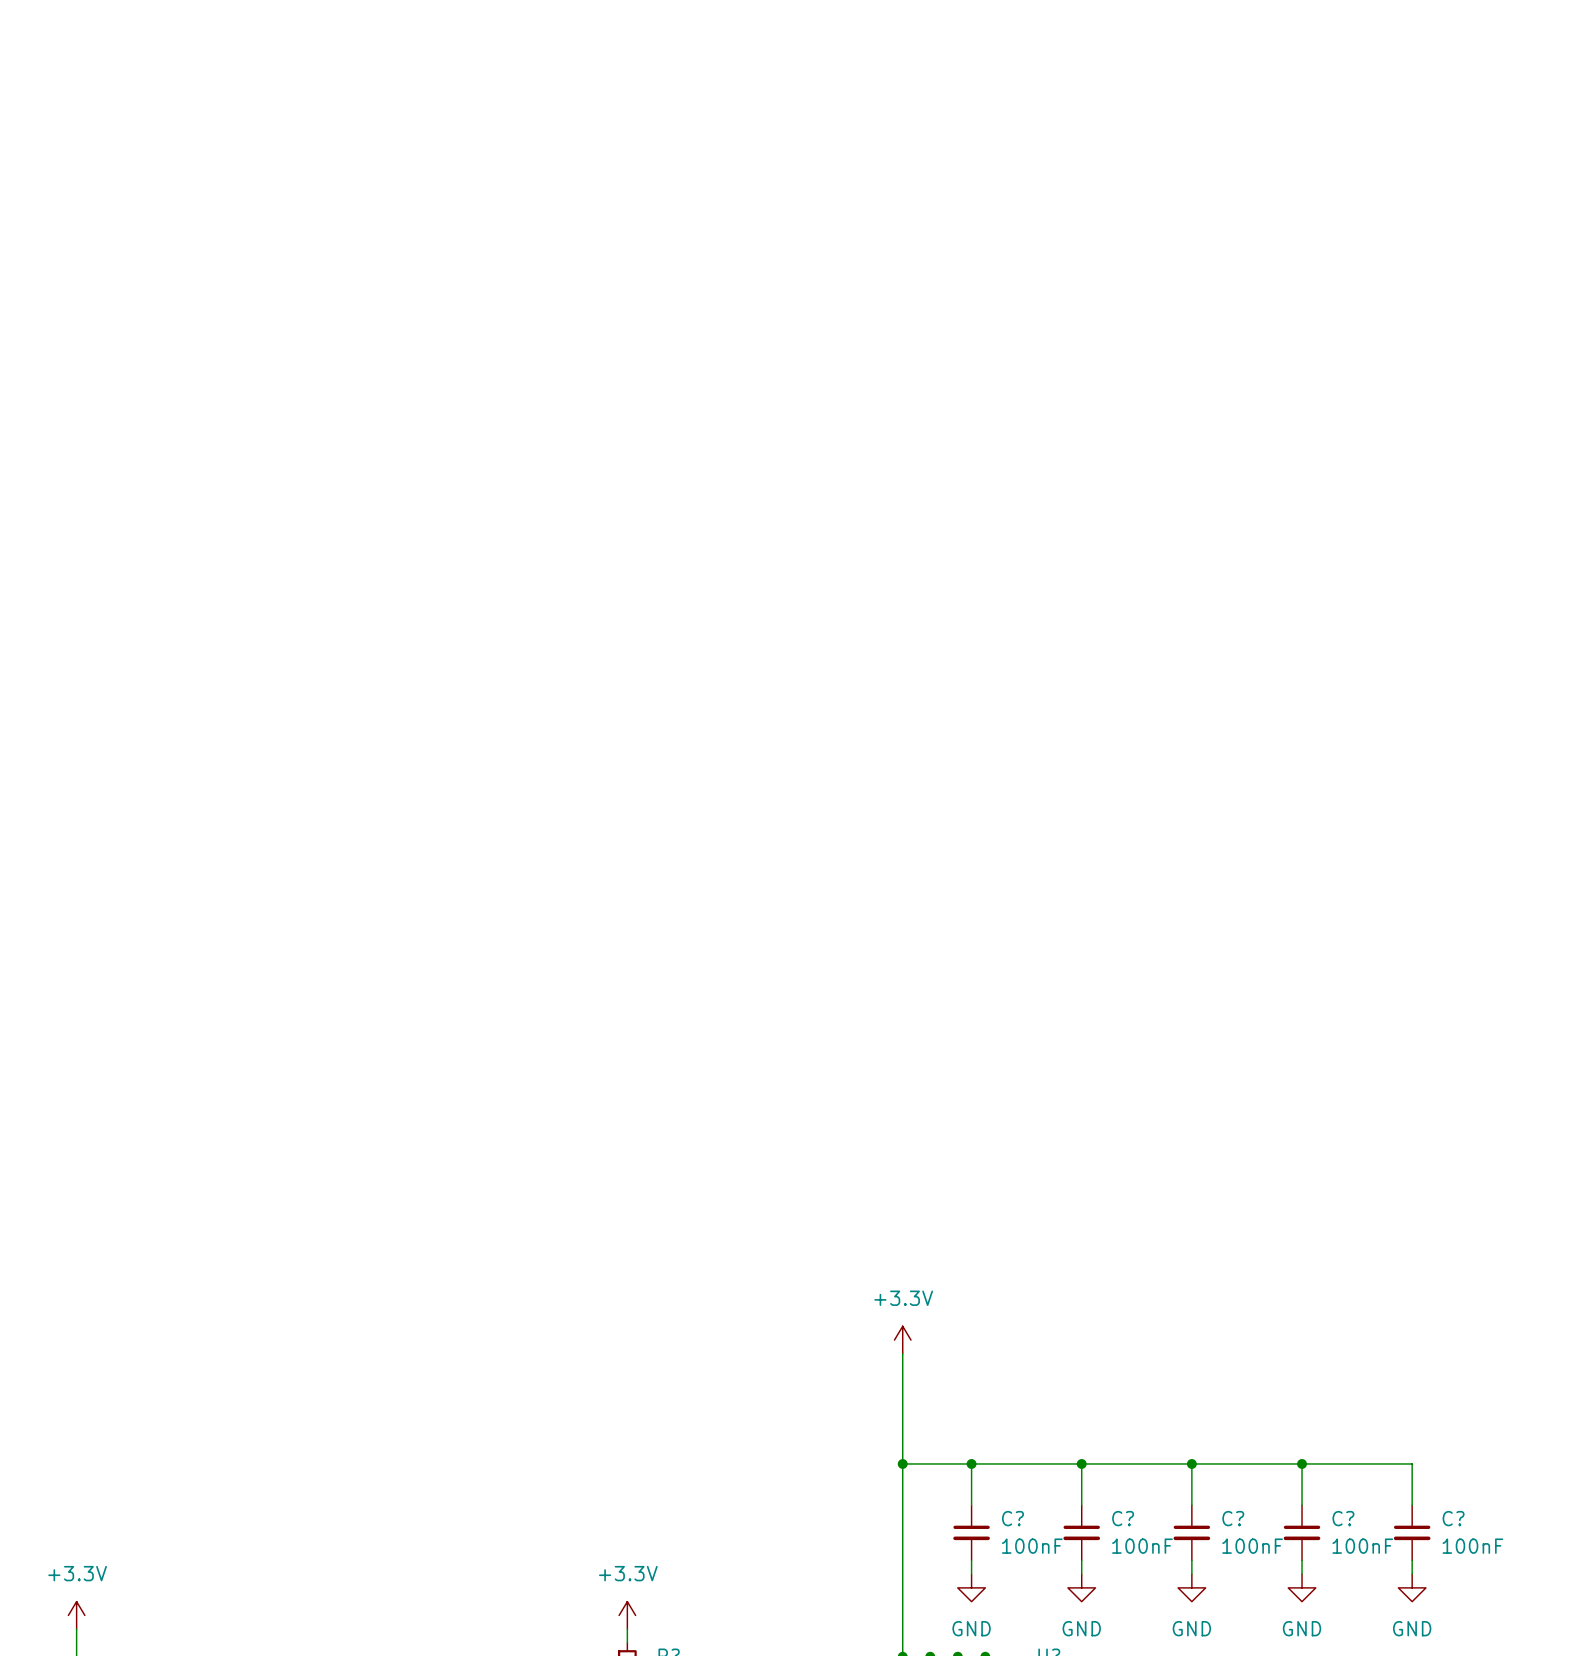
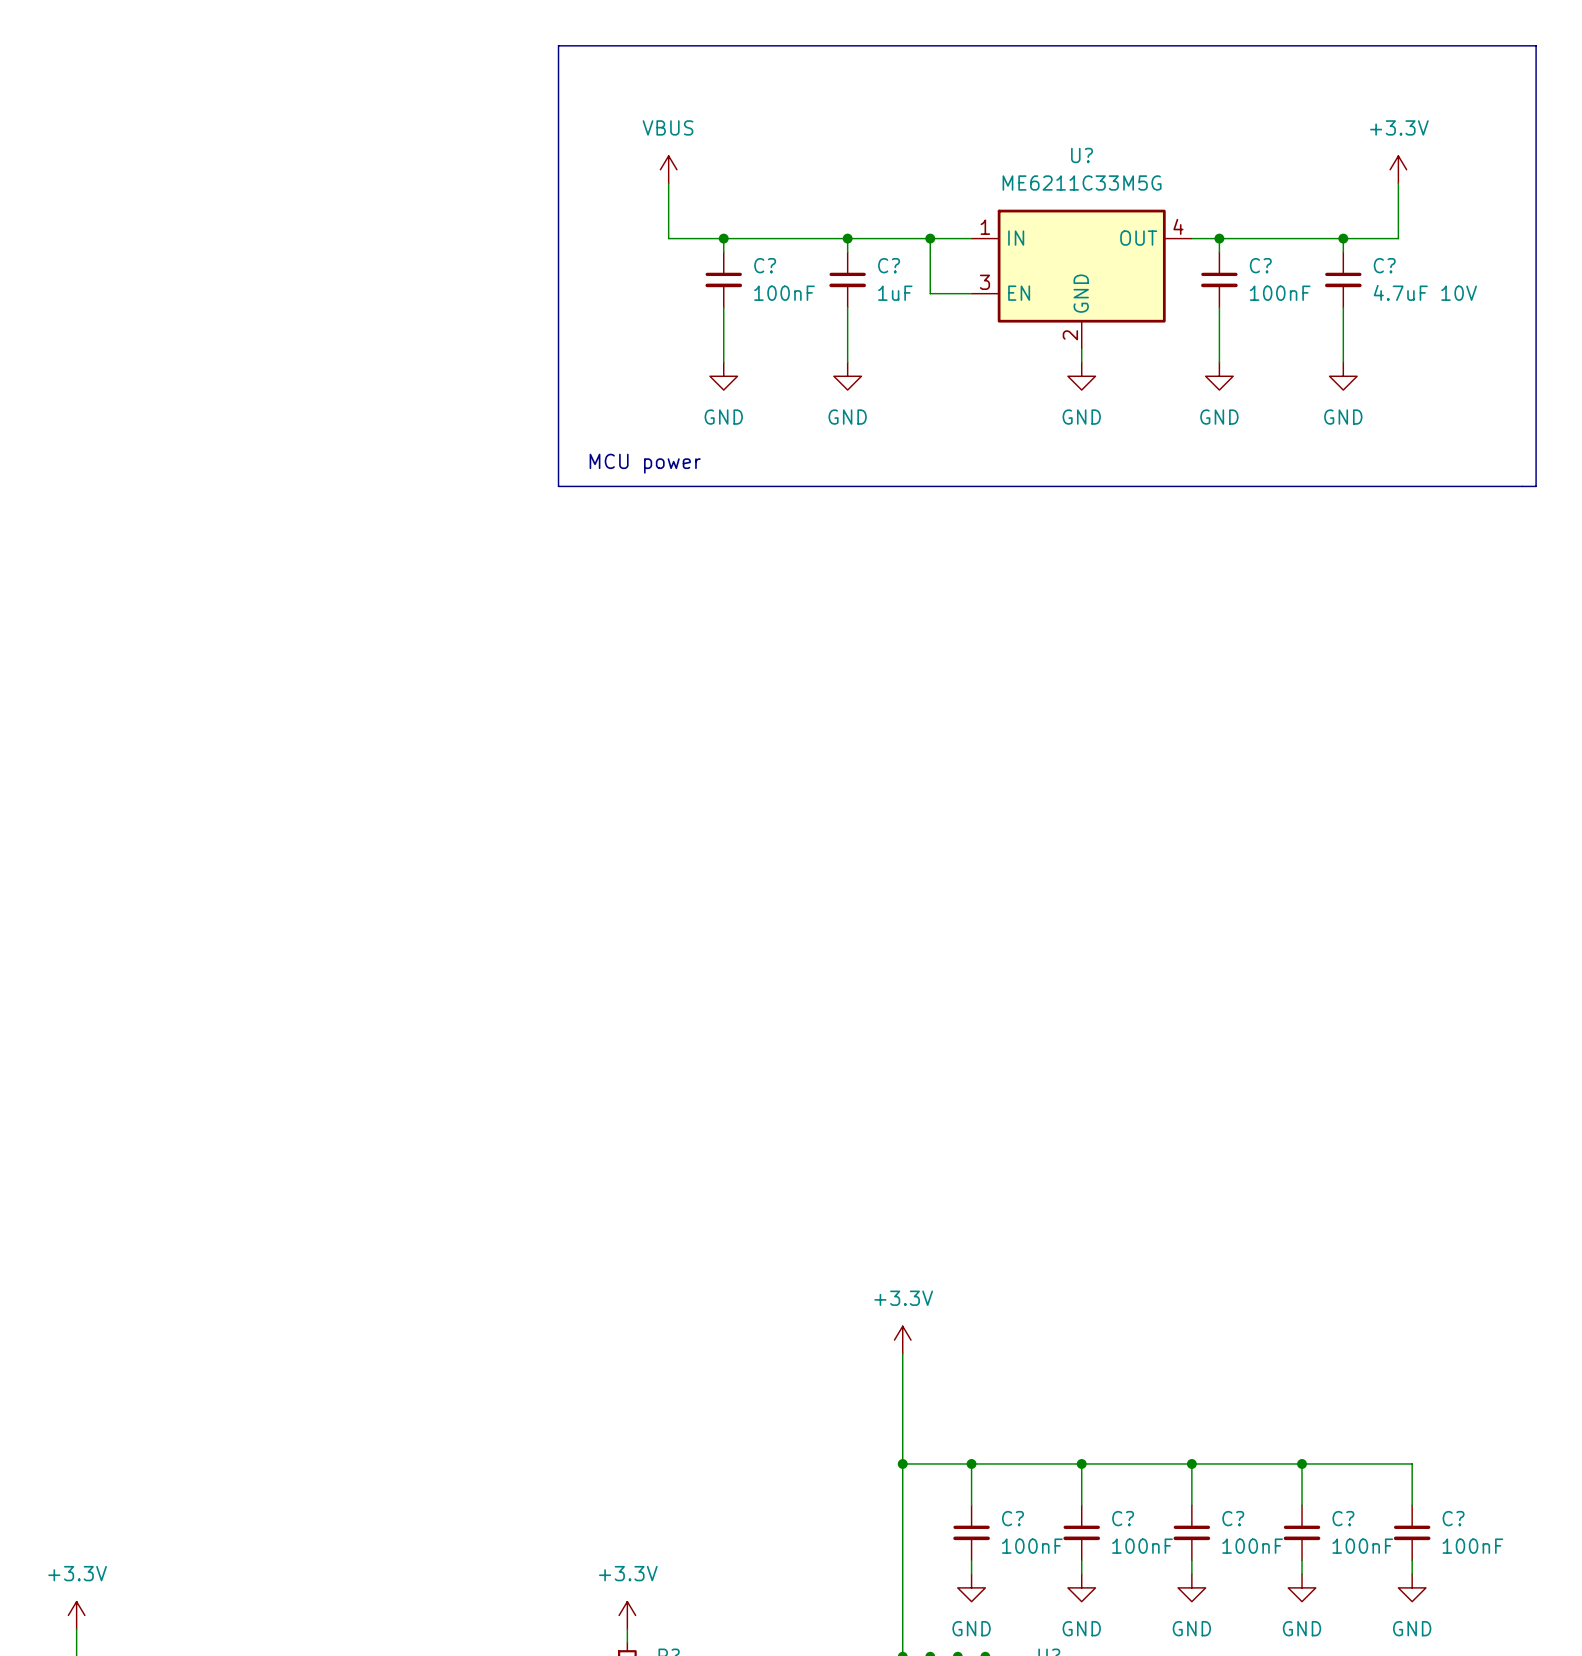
line: none -> (558, 45) (1536, 45) (1536, 486) (558, 486) (558, 45)
power symbol: none -> VBUS (668, 169)
power symbol: none -> +3.3V (1398, 169)
wire: none -> (668, 183) (668, 238) (971, 238)
wire: none -> (1398, 183) (1398, 238) (1191, 238)
wire: none -> (723, 238) (723, 252)
junction: none -> (723, 238)
wire: none -> (847, 238) (847, 252)
junction: none -> (847, 238)
wire: none -> (930, 238) (930, 293) (971, 293)
junction: none -> (930, 238)
wire: none -> (1219, 238) (1219, 252)
junction: none -> (1219, 238)
wire: none -> (1343, 238) (1343, 252)
junction: none -> (1343, 238)
C?: none -> 100nF (723, 279)
C?: none -> 1uF (847, 279)
U?: none -> ME6211C33M5G (1081, 279)
C?: none -> 100nF (1219, 279)
C?: none -> 4.7uF 10V (1343, 279)
wire: none -> (723, 307) (723, 362)
wire: none -> (847, 307) (847, 362)
wire: none -> (1219, 307) (1219, 362)
wire: none -> (1343, 307) (1343, 362)
wire: none -> (1081, 348) (1081, 362)
power symbol: none -> GND (723, 376)
power symbol: none -> GND (847, 376)
power symbol: none -> GND (1081, 376)
power symbol: none -> GND (1219, 376)
power symbol: none -> GND (1343, 376)
text: none -> MCU power (645, 463)

